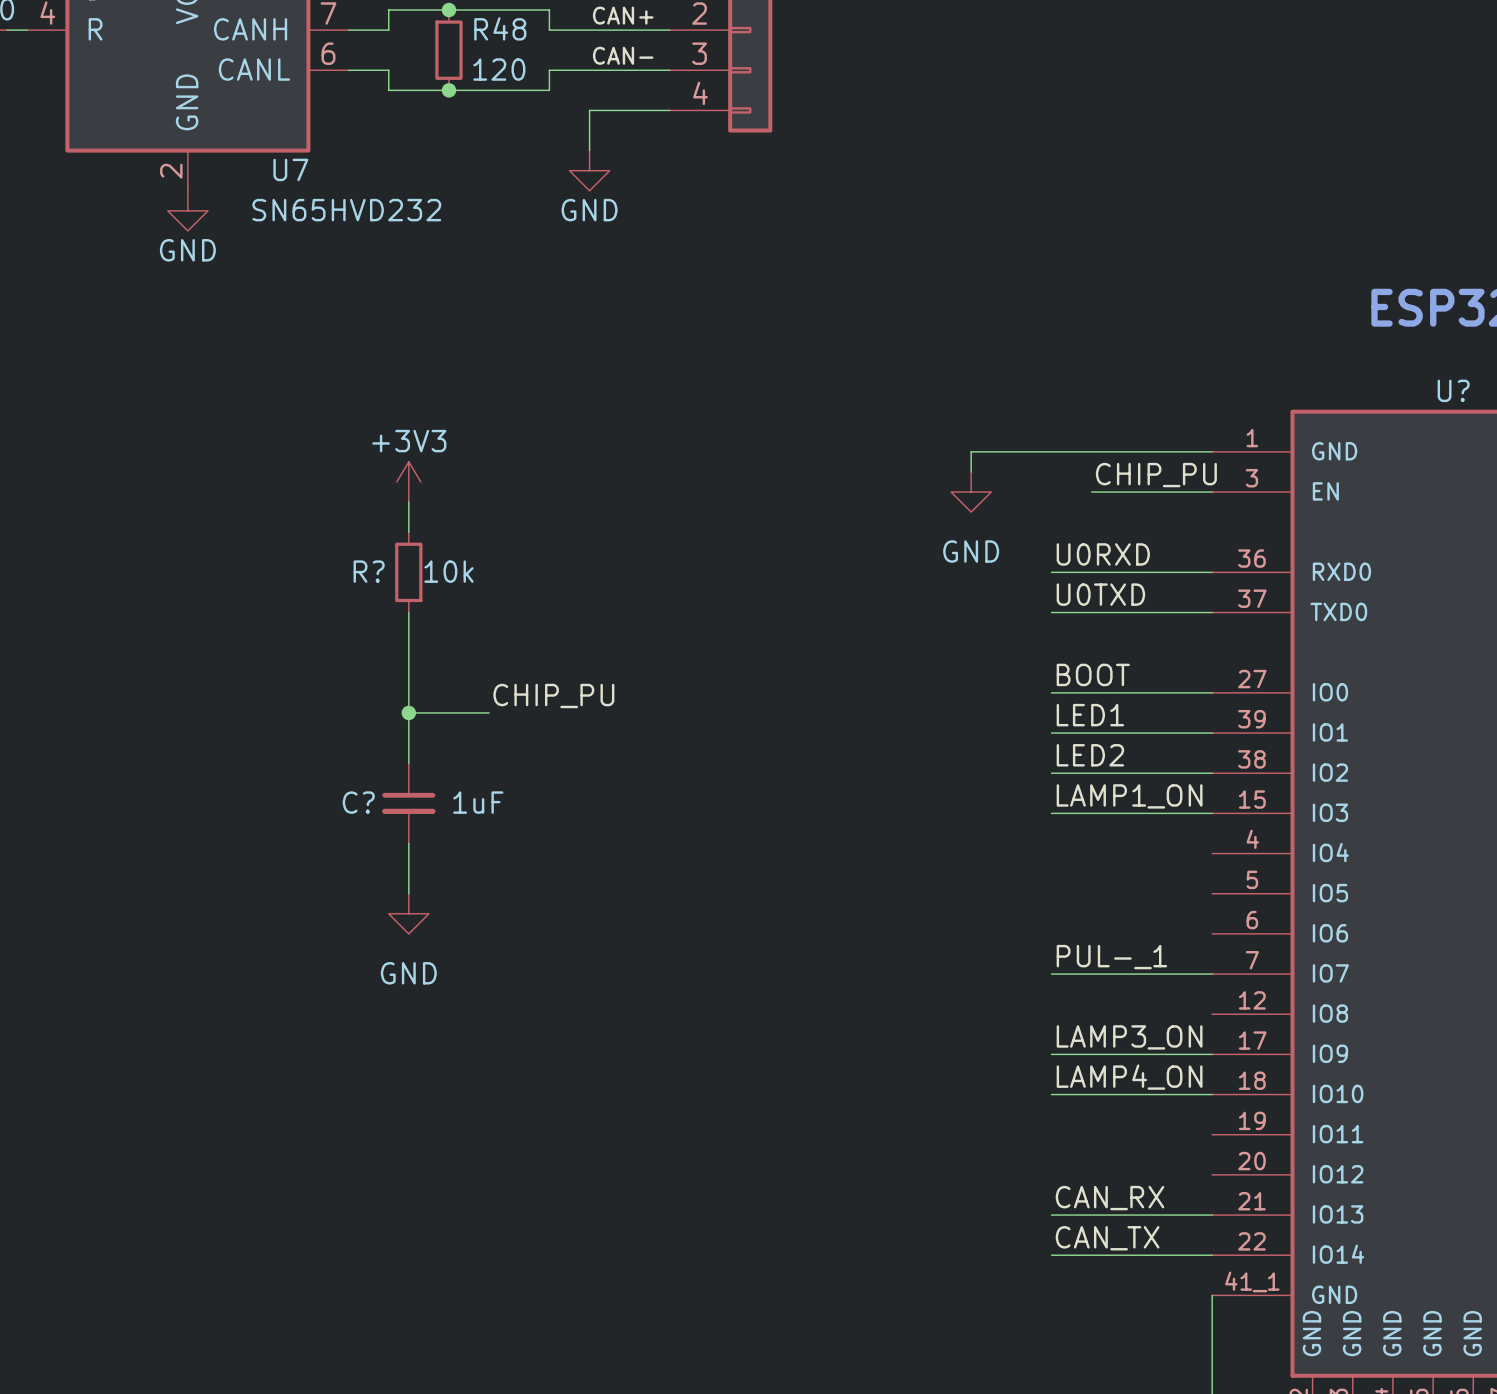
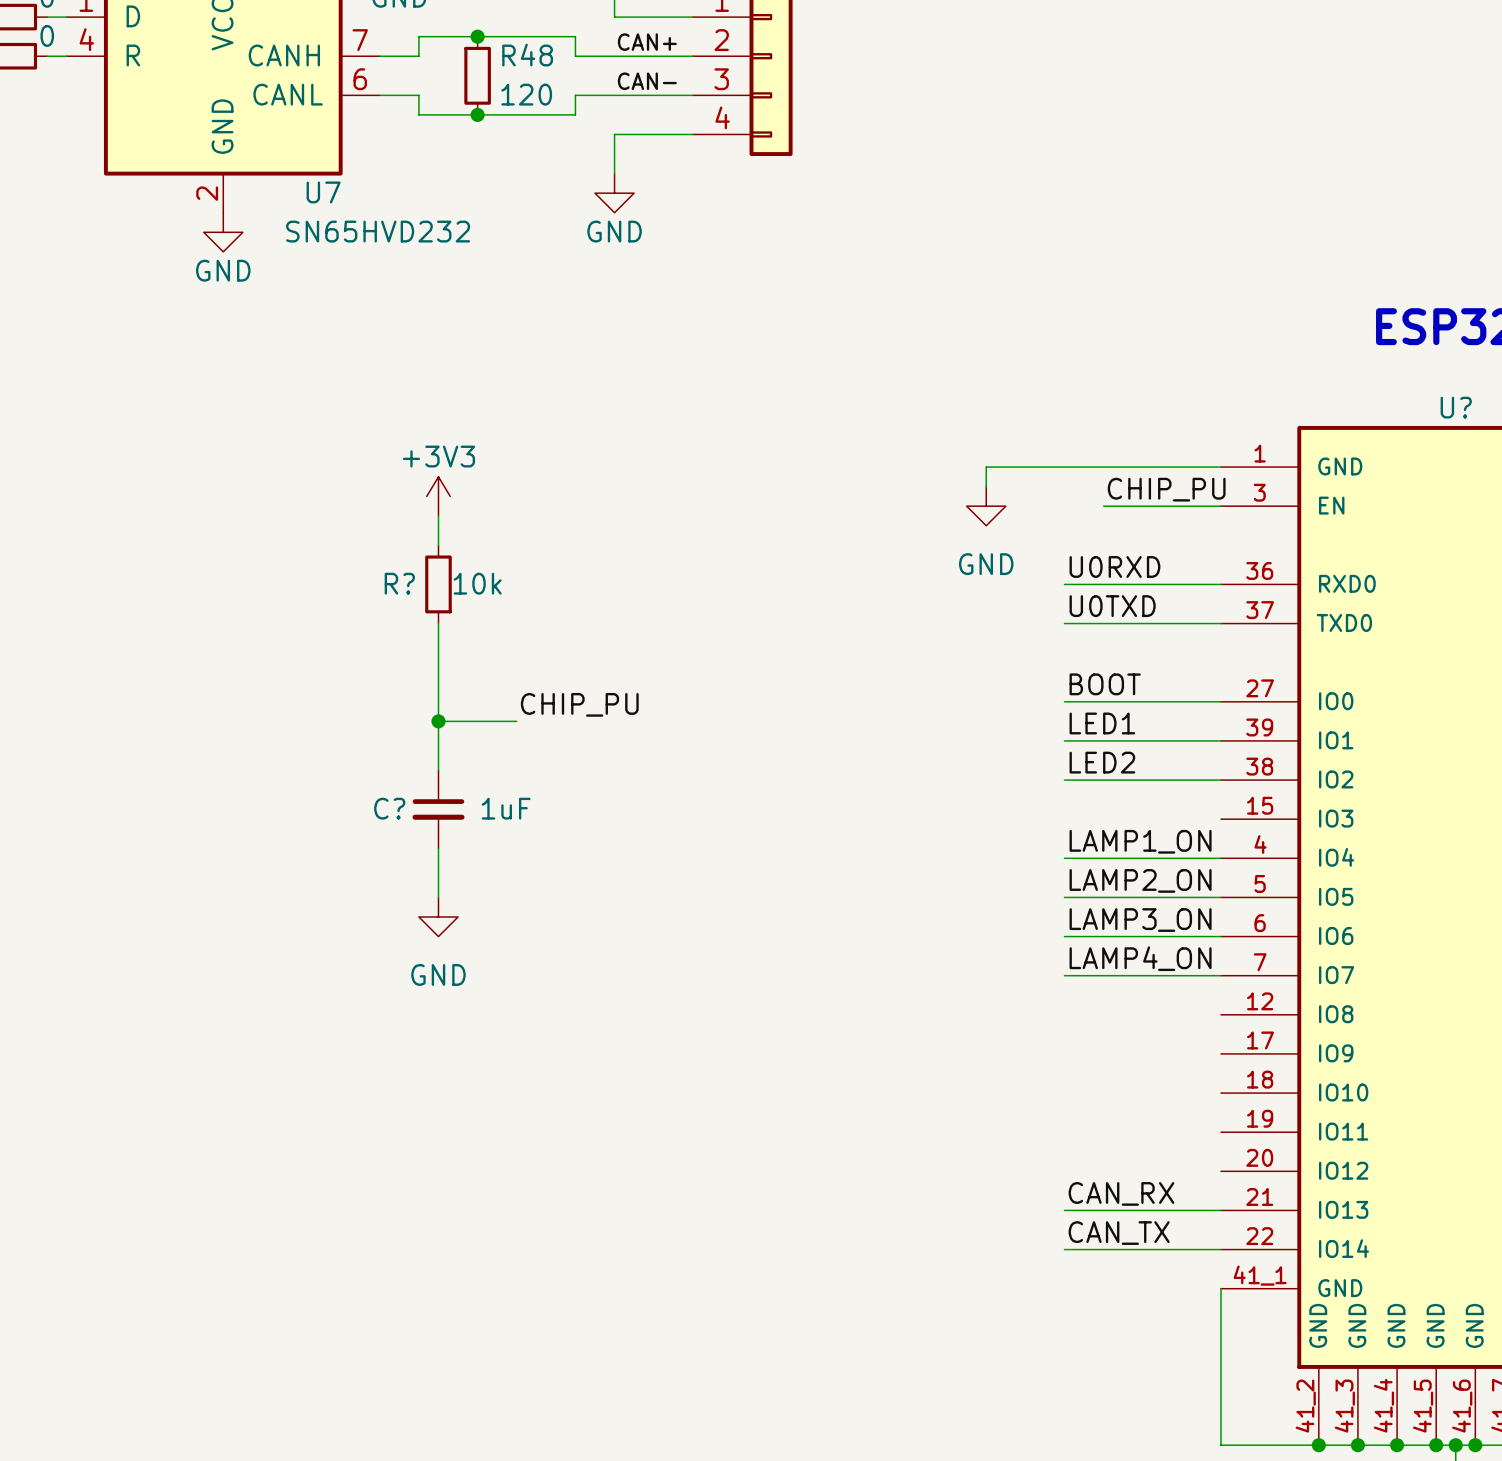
label position: LAMP1_ON (1129, 796) -> LAMP1_ON (1140, 841)
wire: (1051, 813) (1212, 813) -> (1064, 858) (1221, 858)
label: none -> LAMP2_ON (1140, 880)
label: PUL-_1 (1111, 957) -> LAMP4_ON (1140, 958)
label position: LAMP3_ON (1129, 1037) -> LAMP3_ON (1140, 920)
wire: (1051, 1054) (1212, 1054) -> (1064, 936) (1221, 936)
label: LAMP4_ON (1129, 1077) -> none
wire: (1051, 1094) (1212, 1094) -> (1064, 897) (1221, 897)

